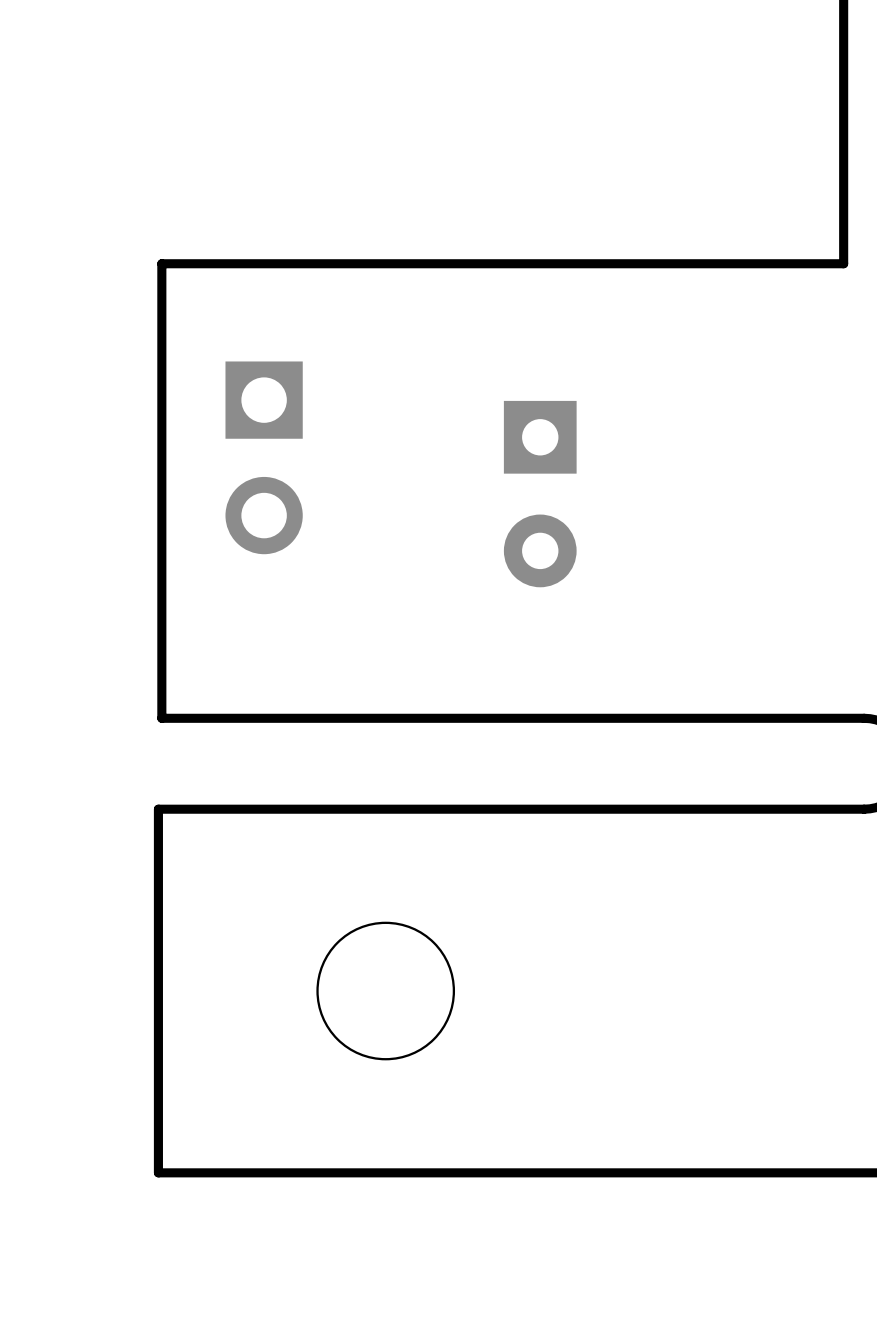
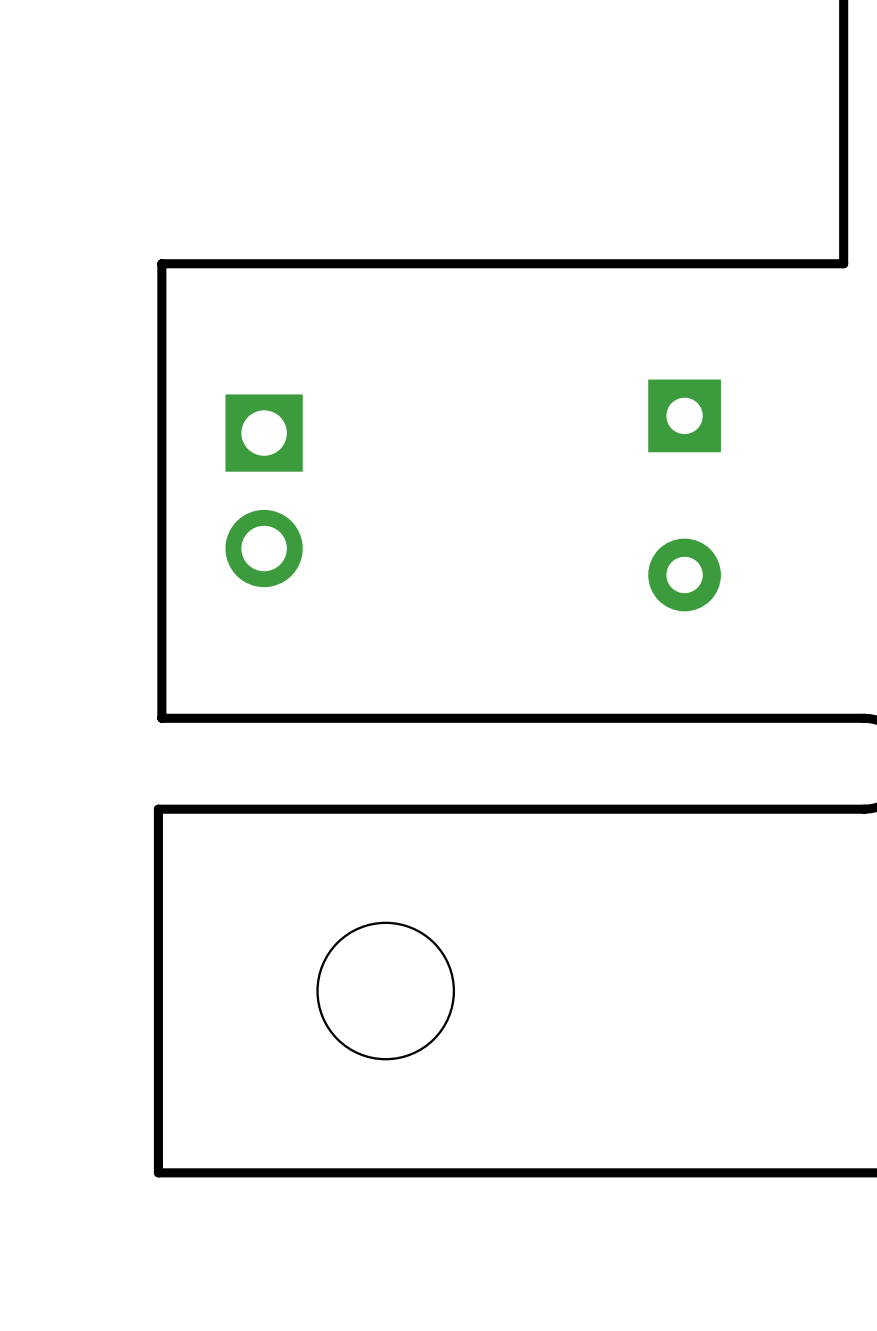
part position: (264, 457) -> (264, 490)
part: (540, 494) -> none
part: none -> (684, 495)

